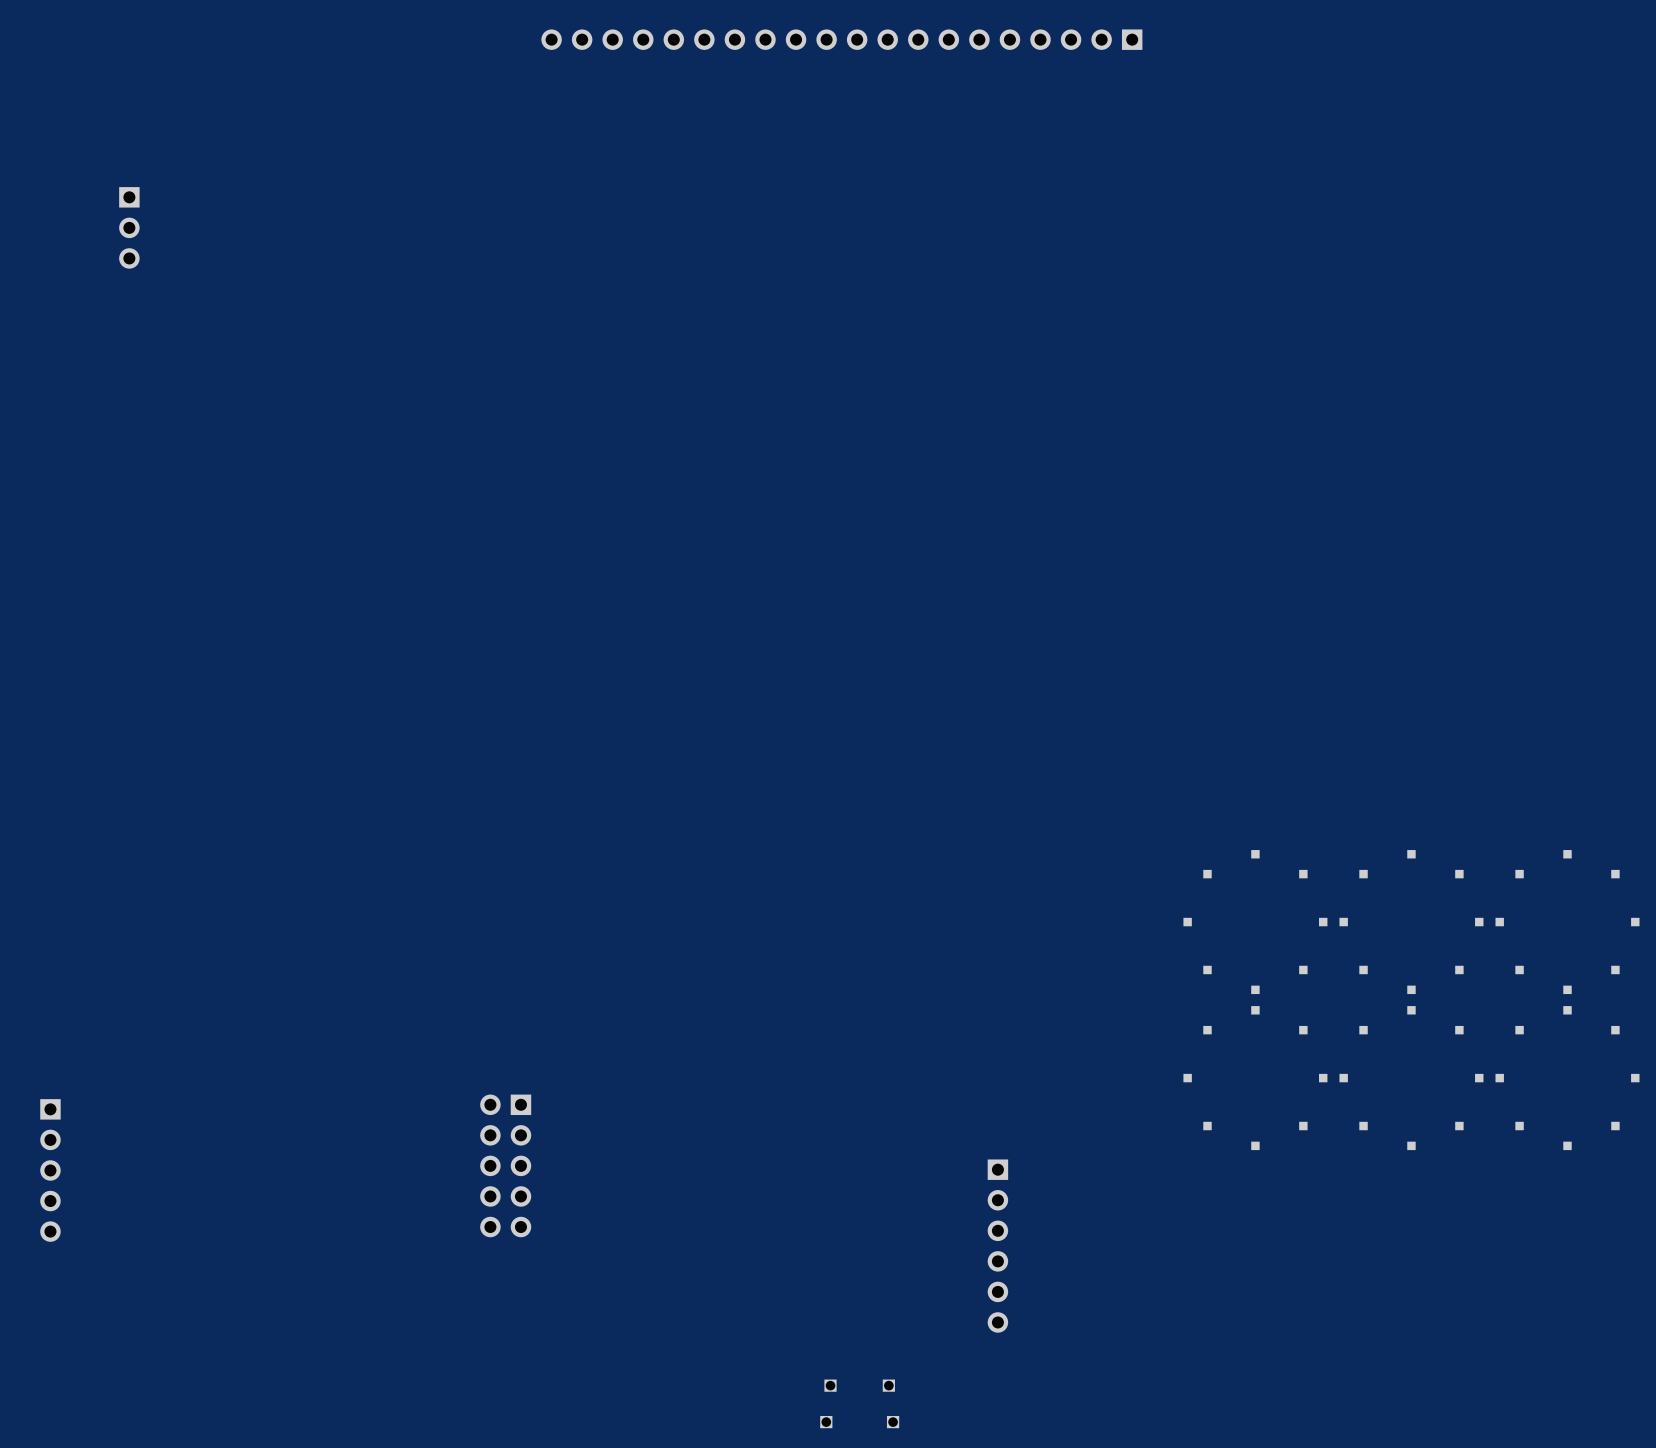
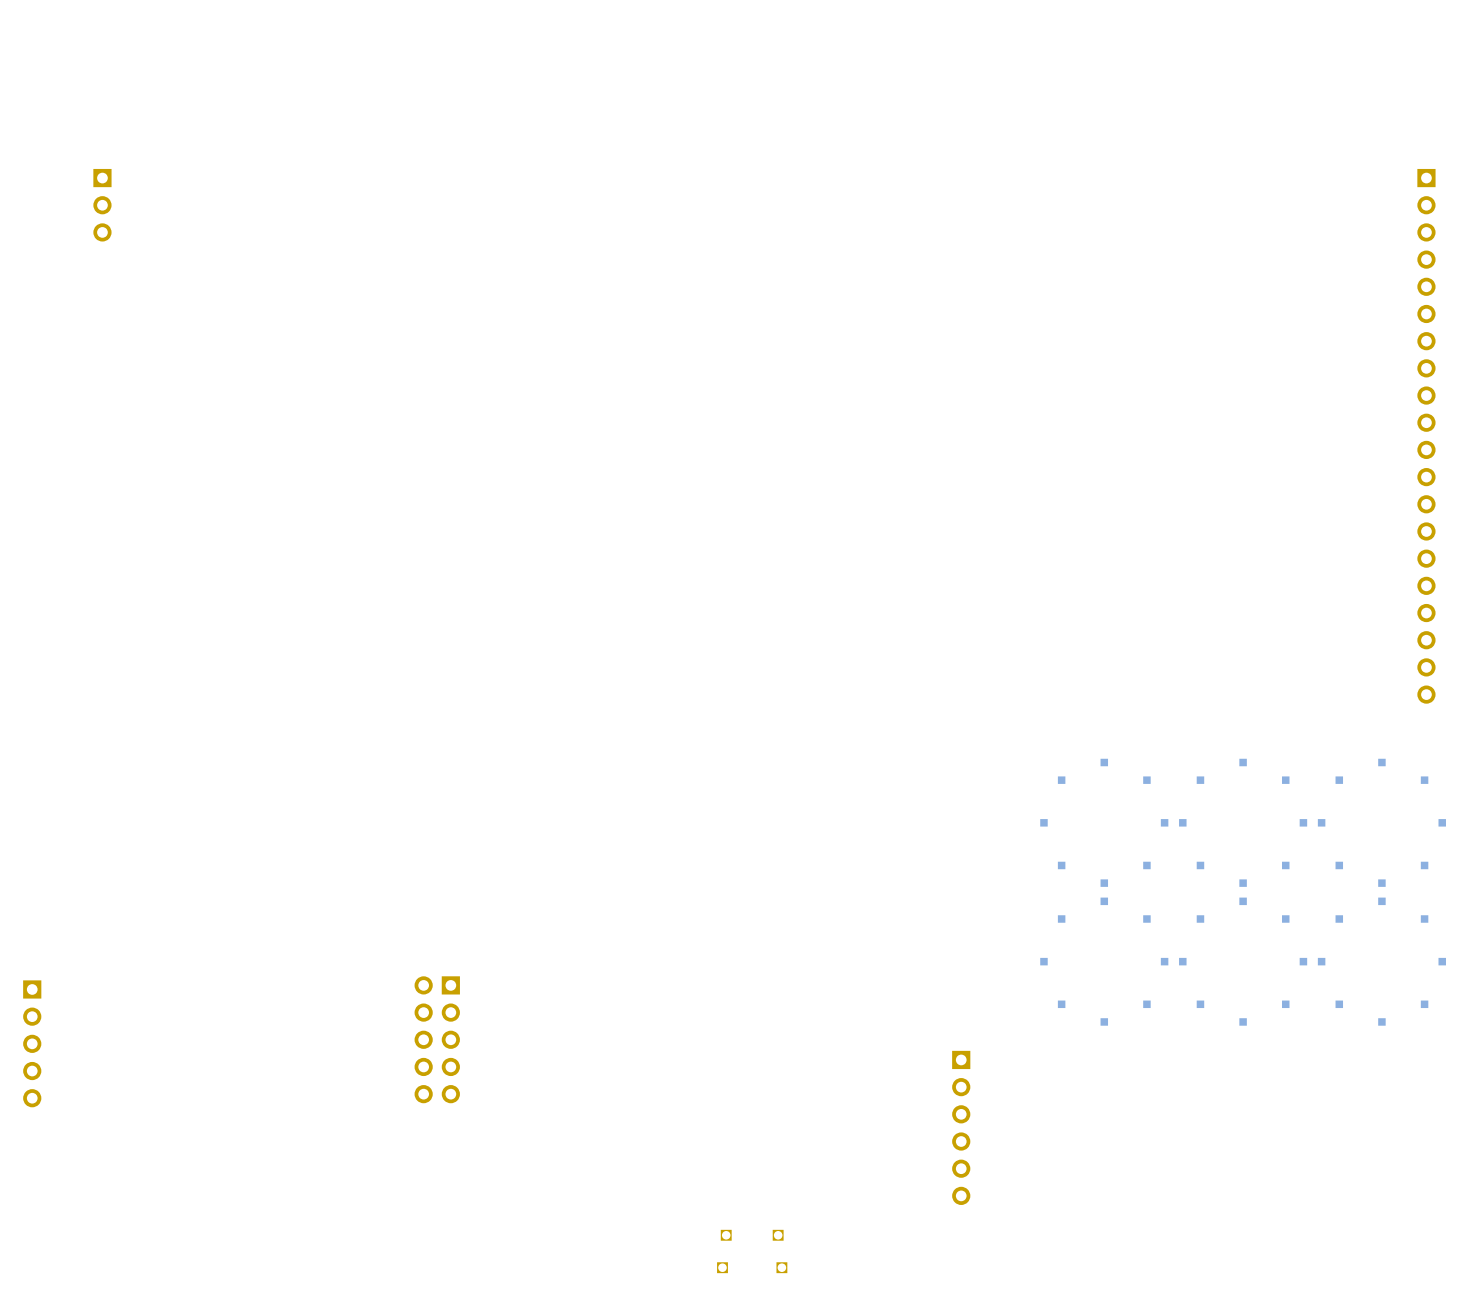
part: (841, 39) -> none
part: none -> (1426, 436)
part position: (997, 1246) -> (961, 1127)

